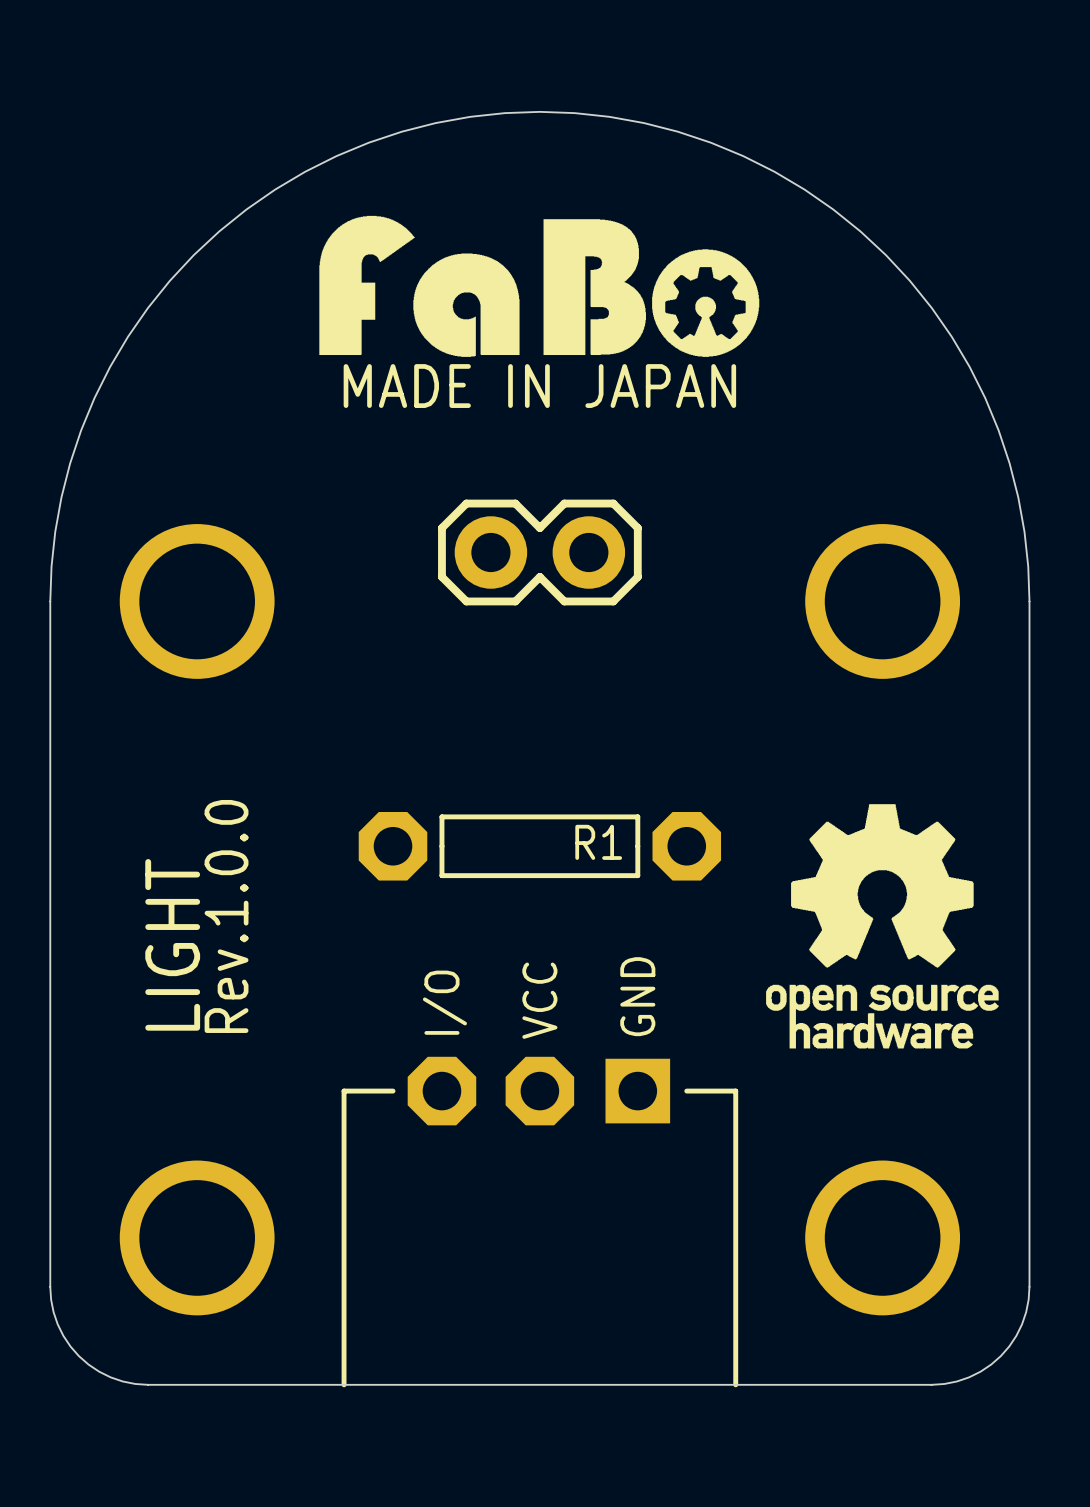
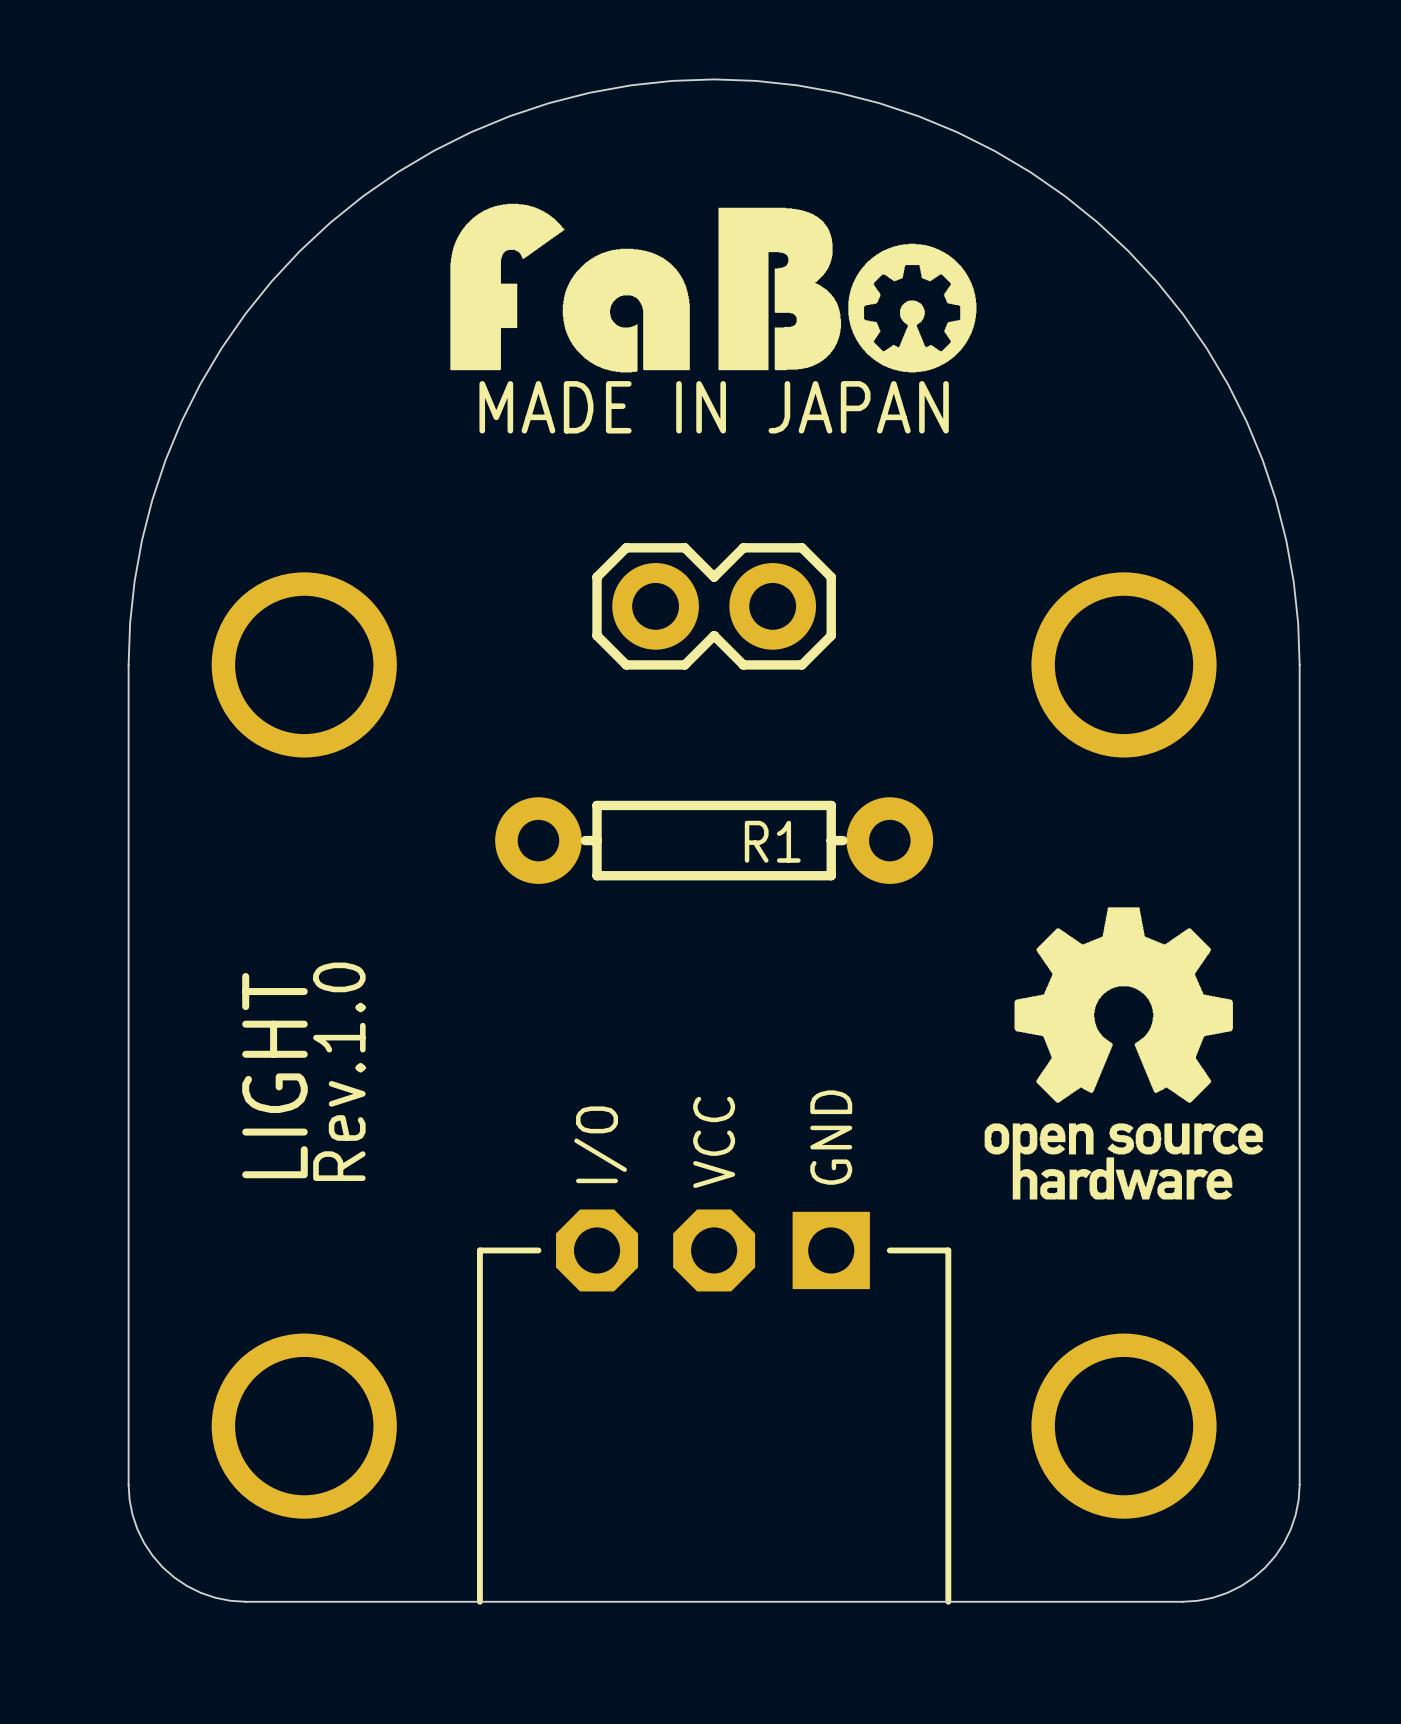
R1 footprint: [358, 811, 722, 881] -> [495, 797, 934, 884]
text: Rev.1.0.0 (226, 916) -> Rev.1.0 (339, 1071)

